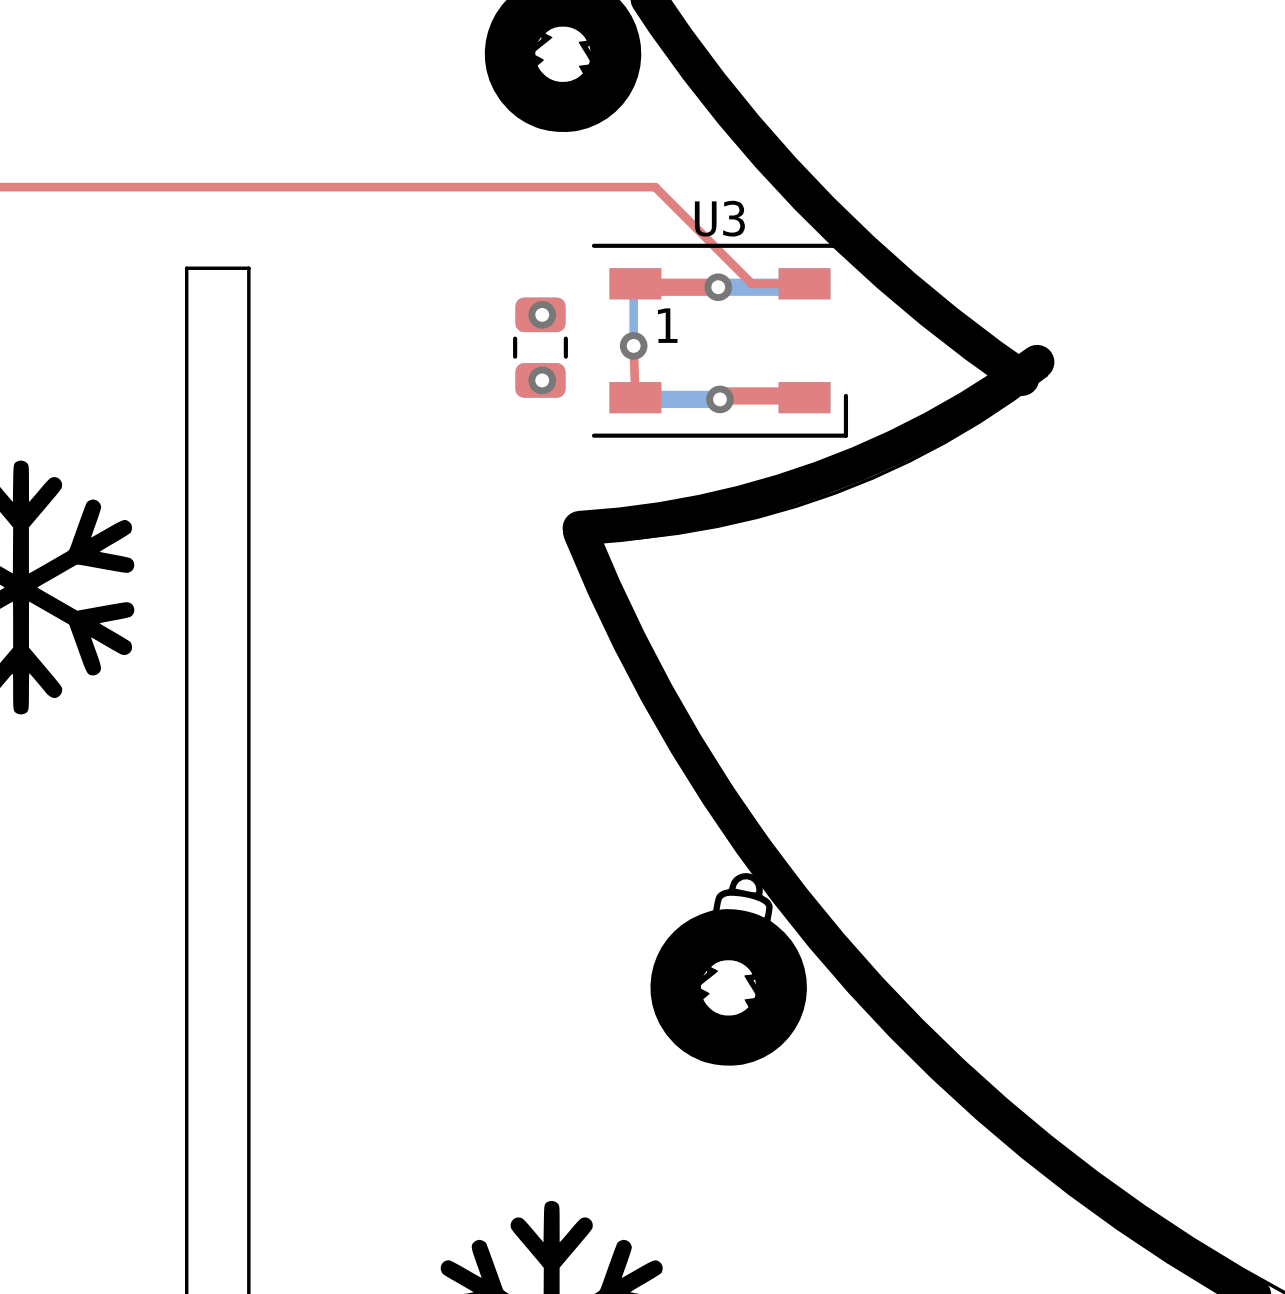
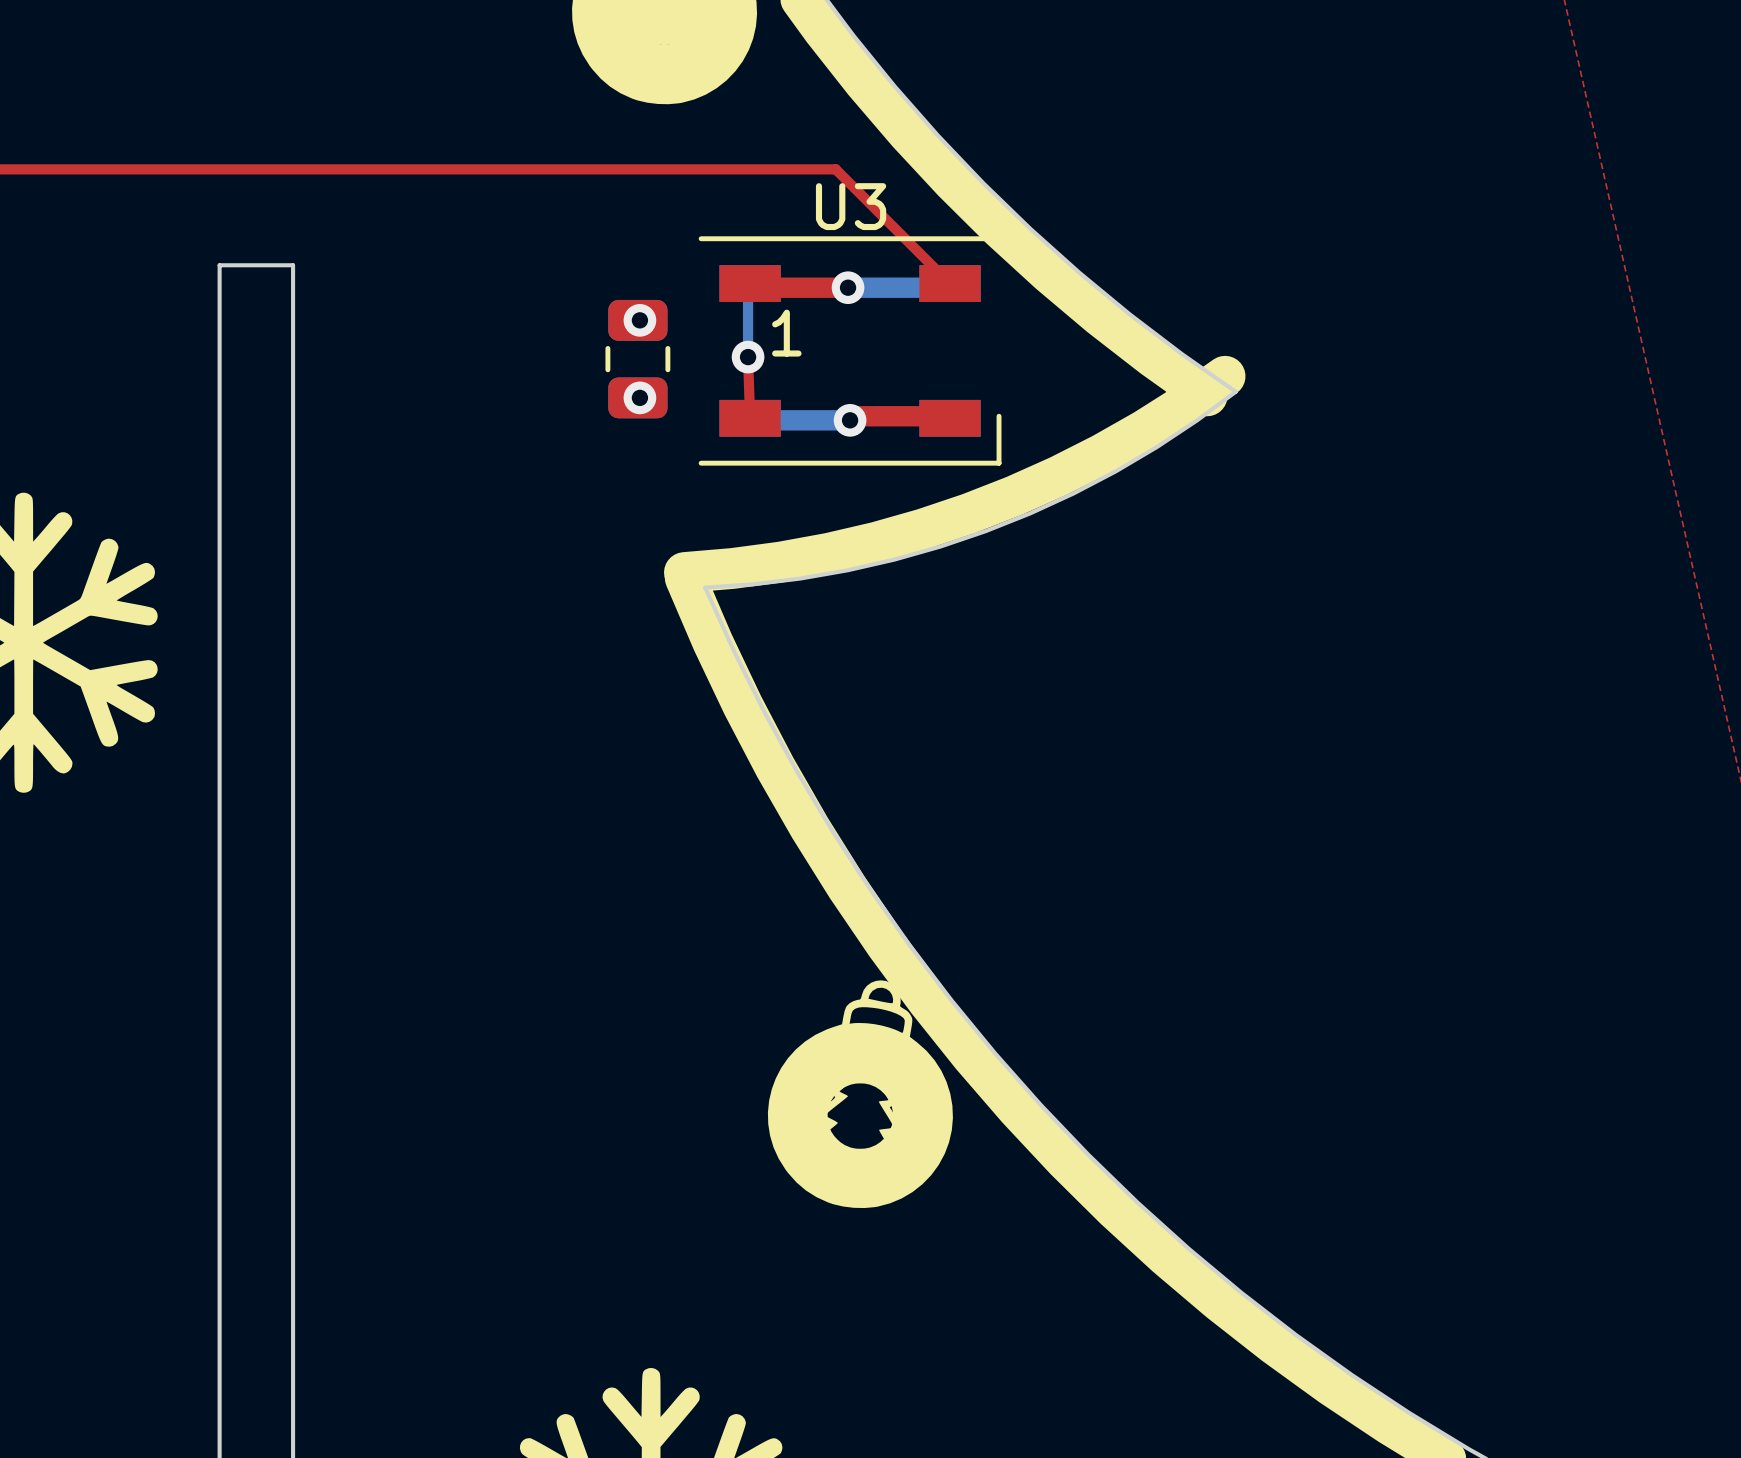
top track: (655, 187) (751, 283) (804, 283) -> (773, 169) (835, 169) (950, 283)

